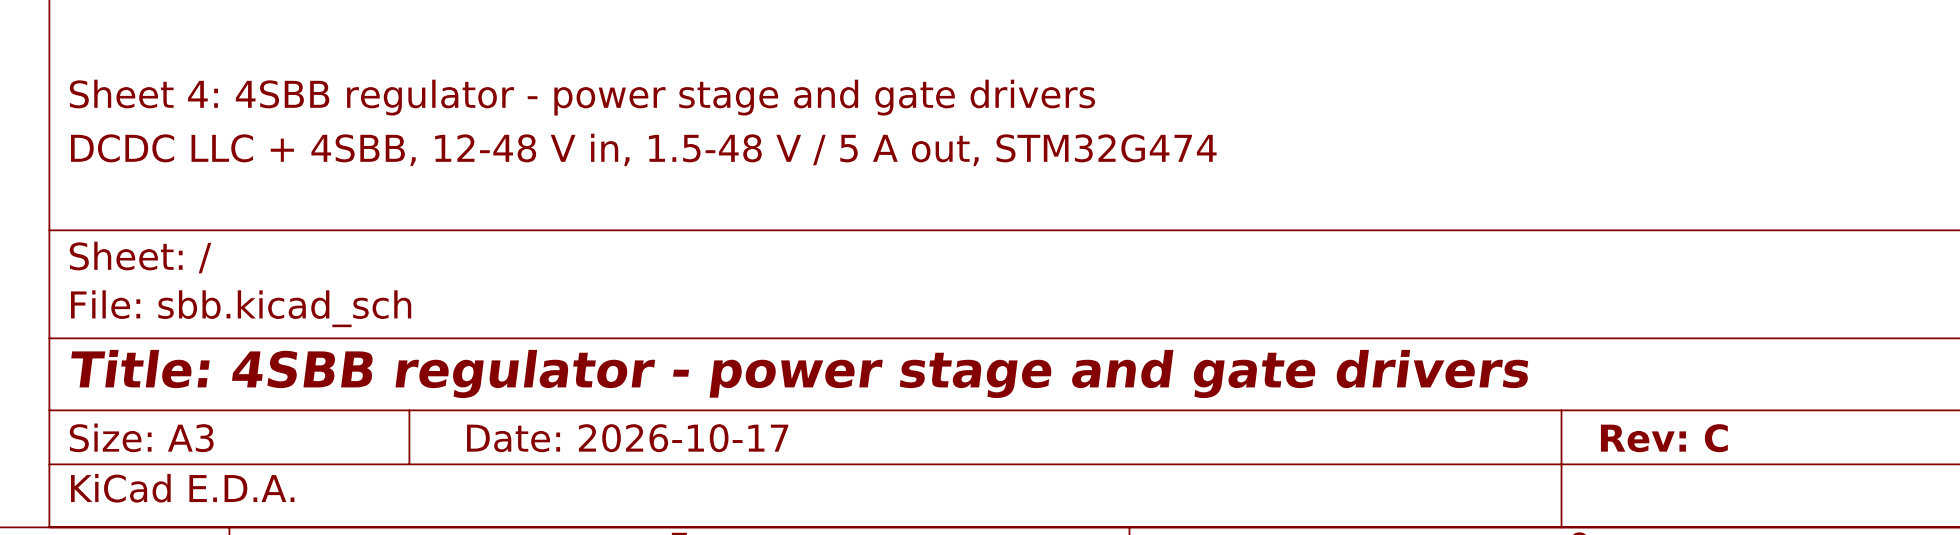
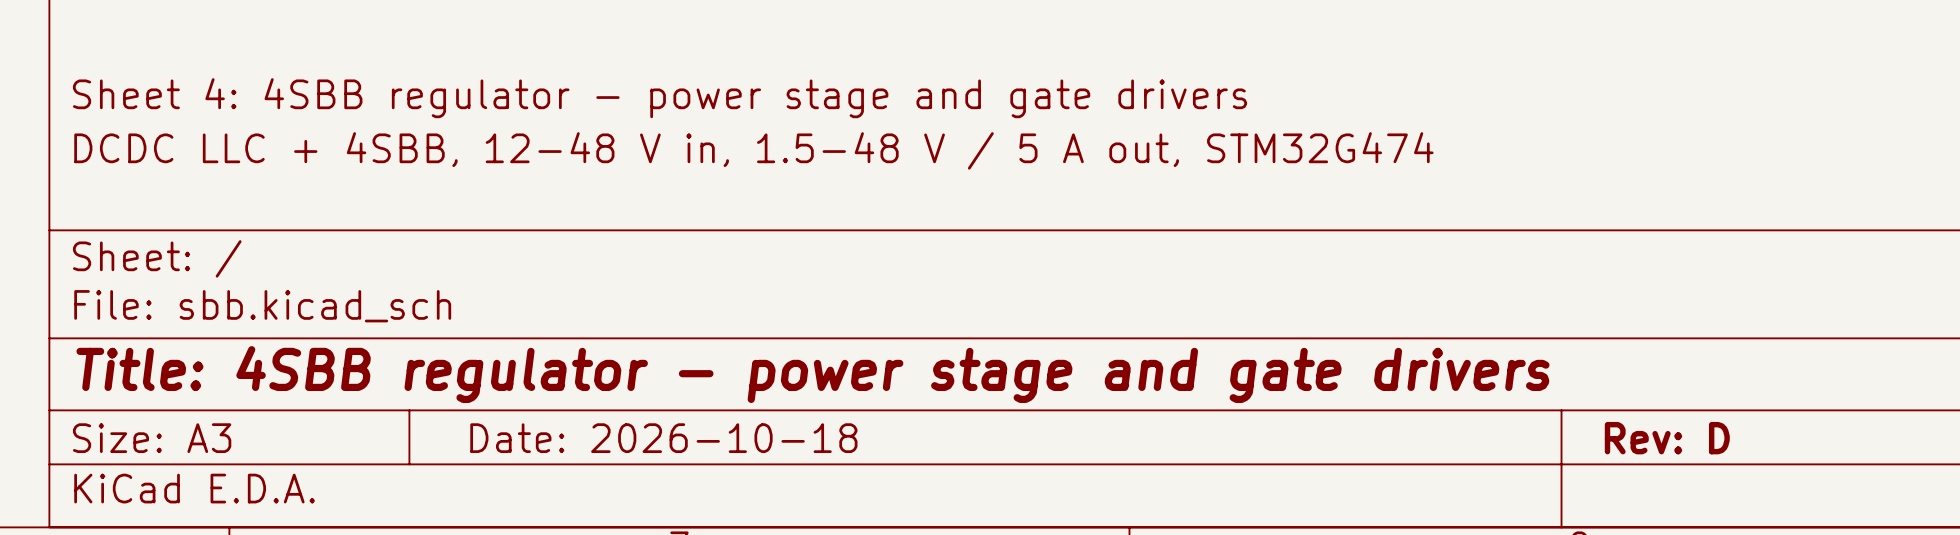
title block: Date: 2026-10-17 (627, 438) -> Date: 2026-10-18 (663, 438)
title block: Rev: C (1664, 438) -> Rev: D (1667, 438)

